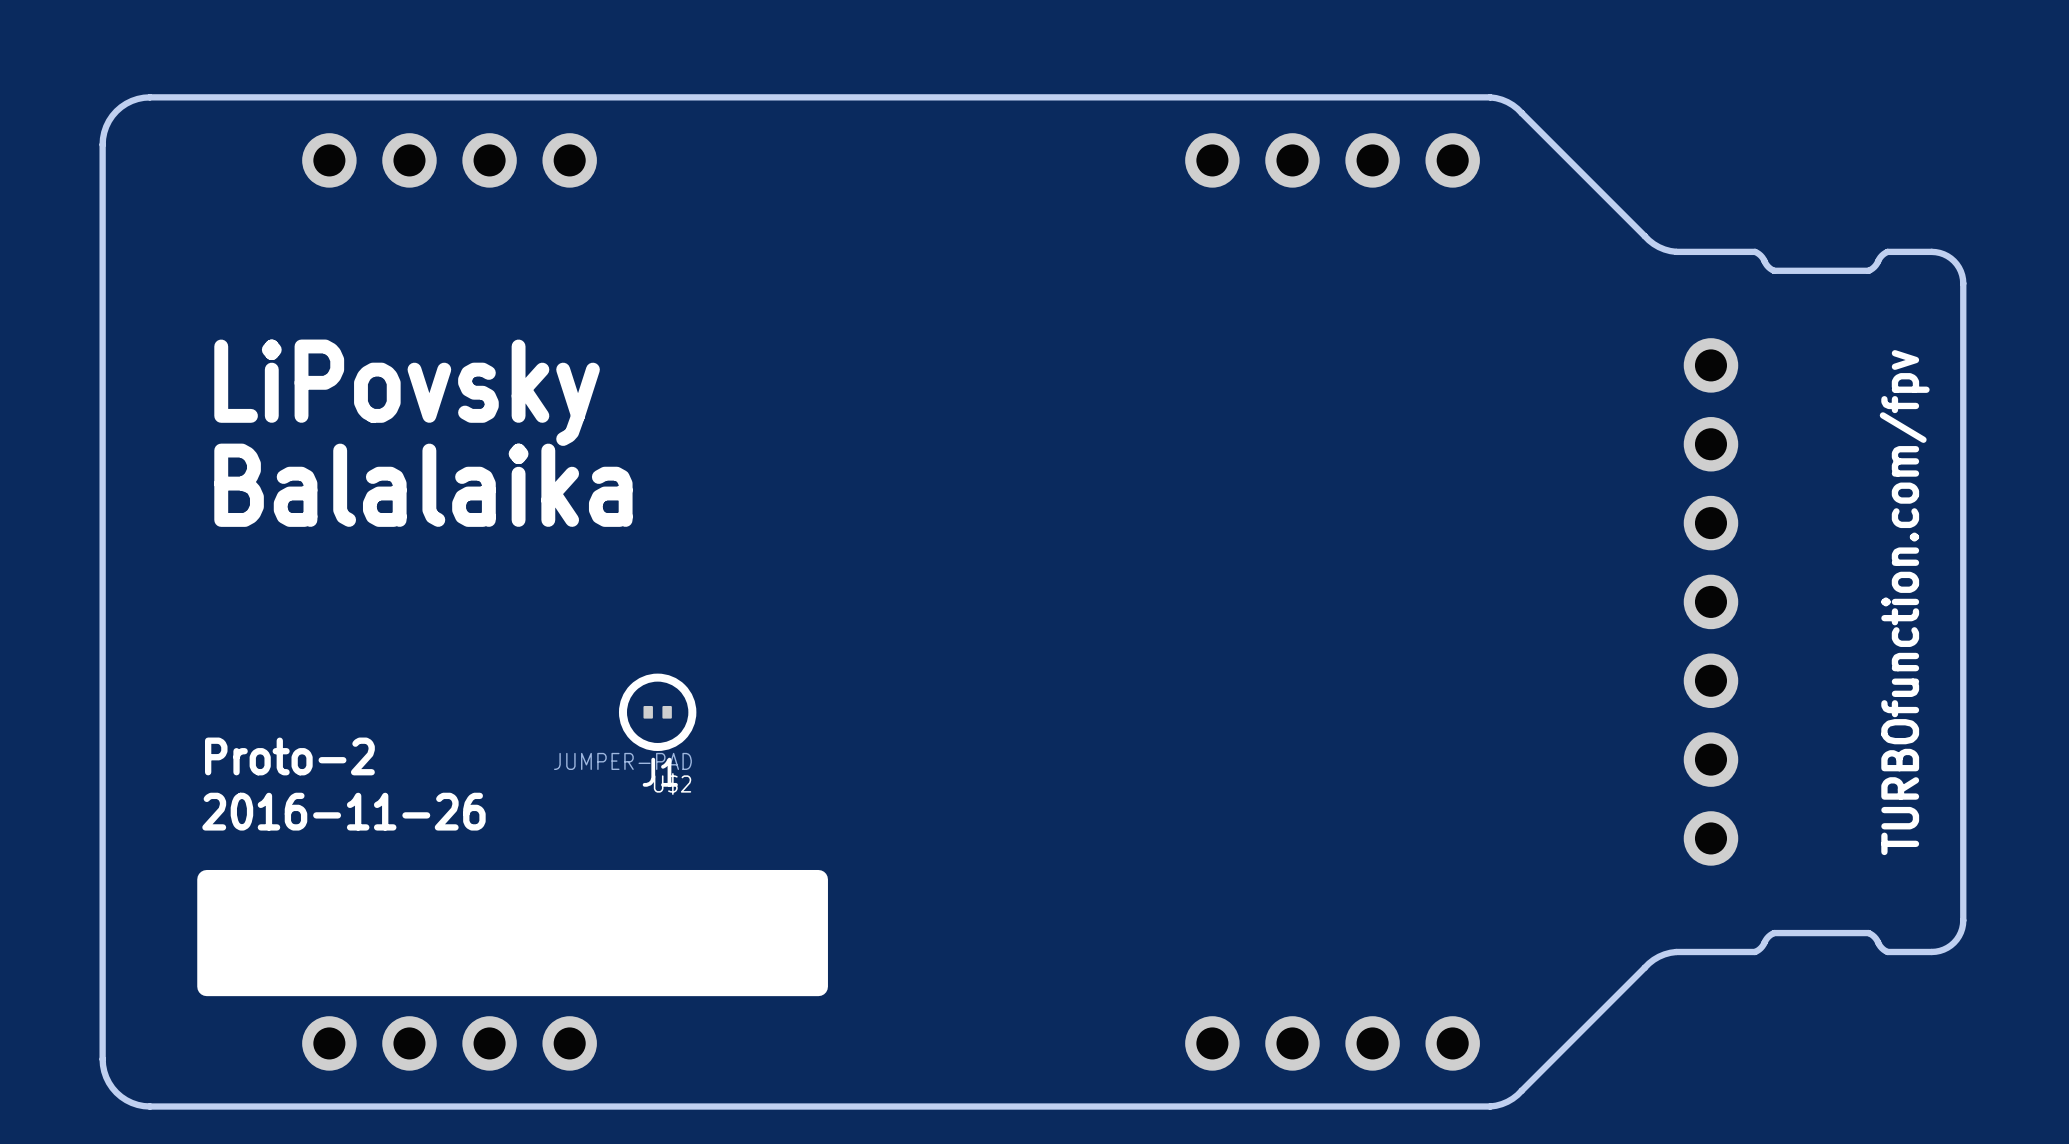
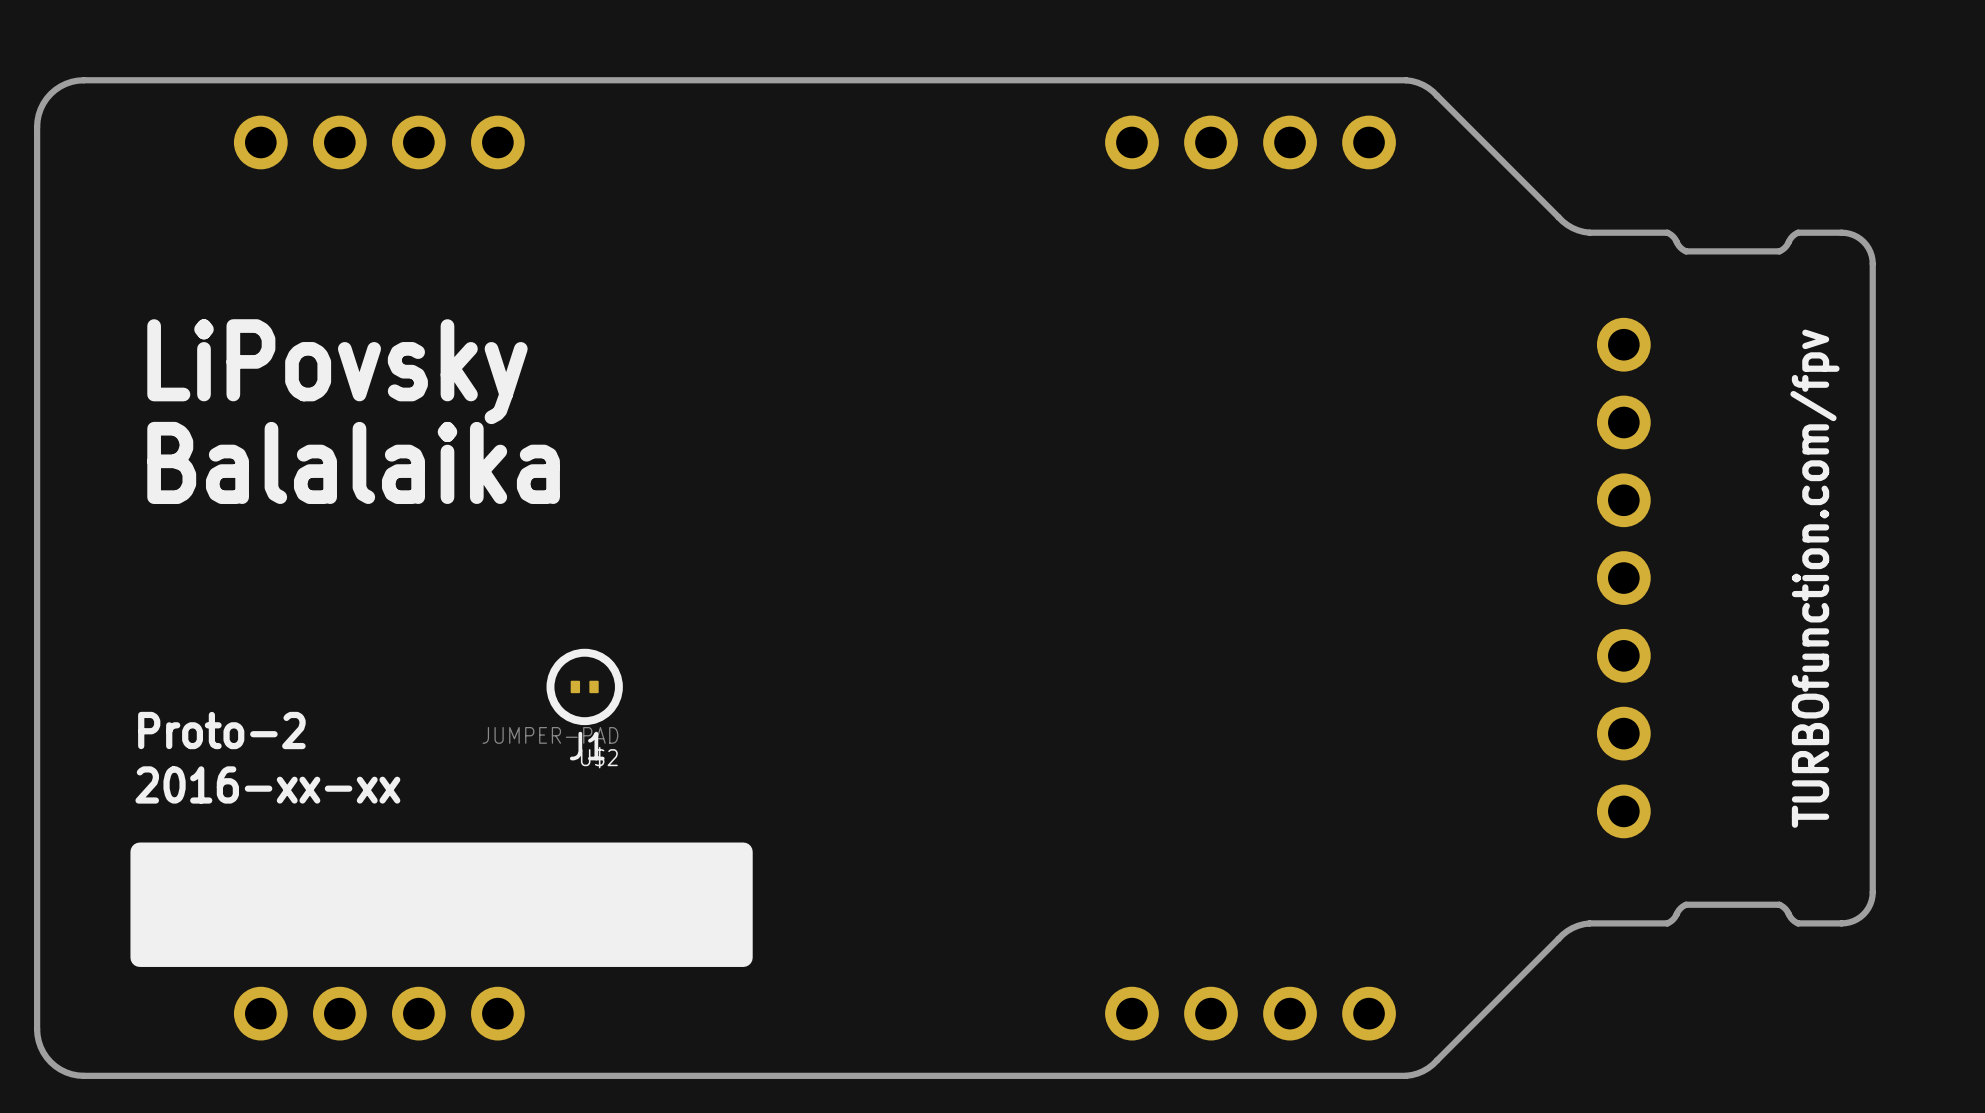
text: 2016-11-26 (343, 811) -> 2016-xx-xx (267, 784)

